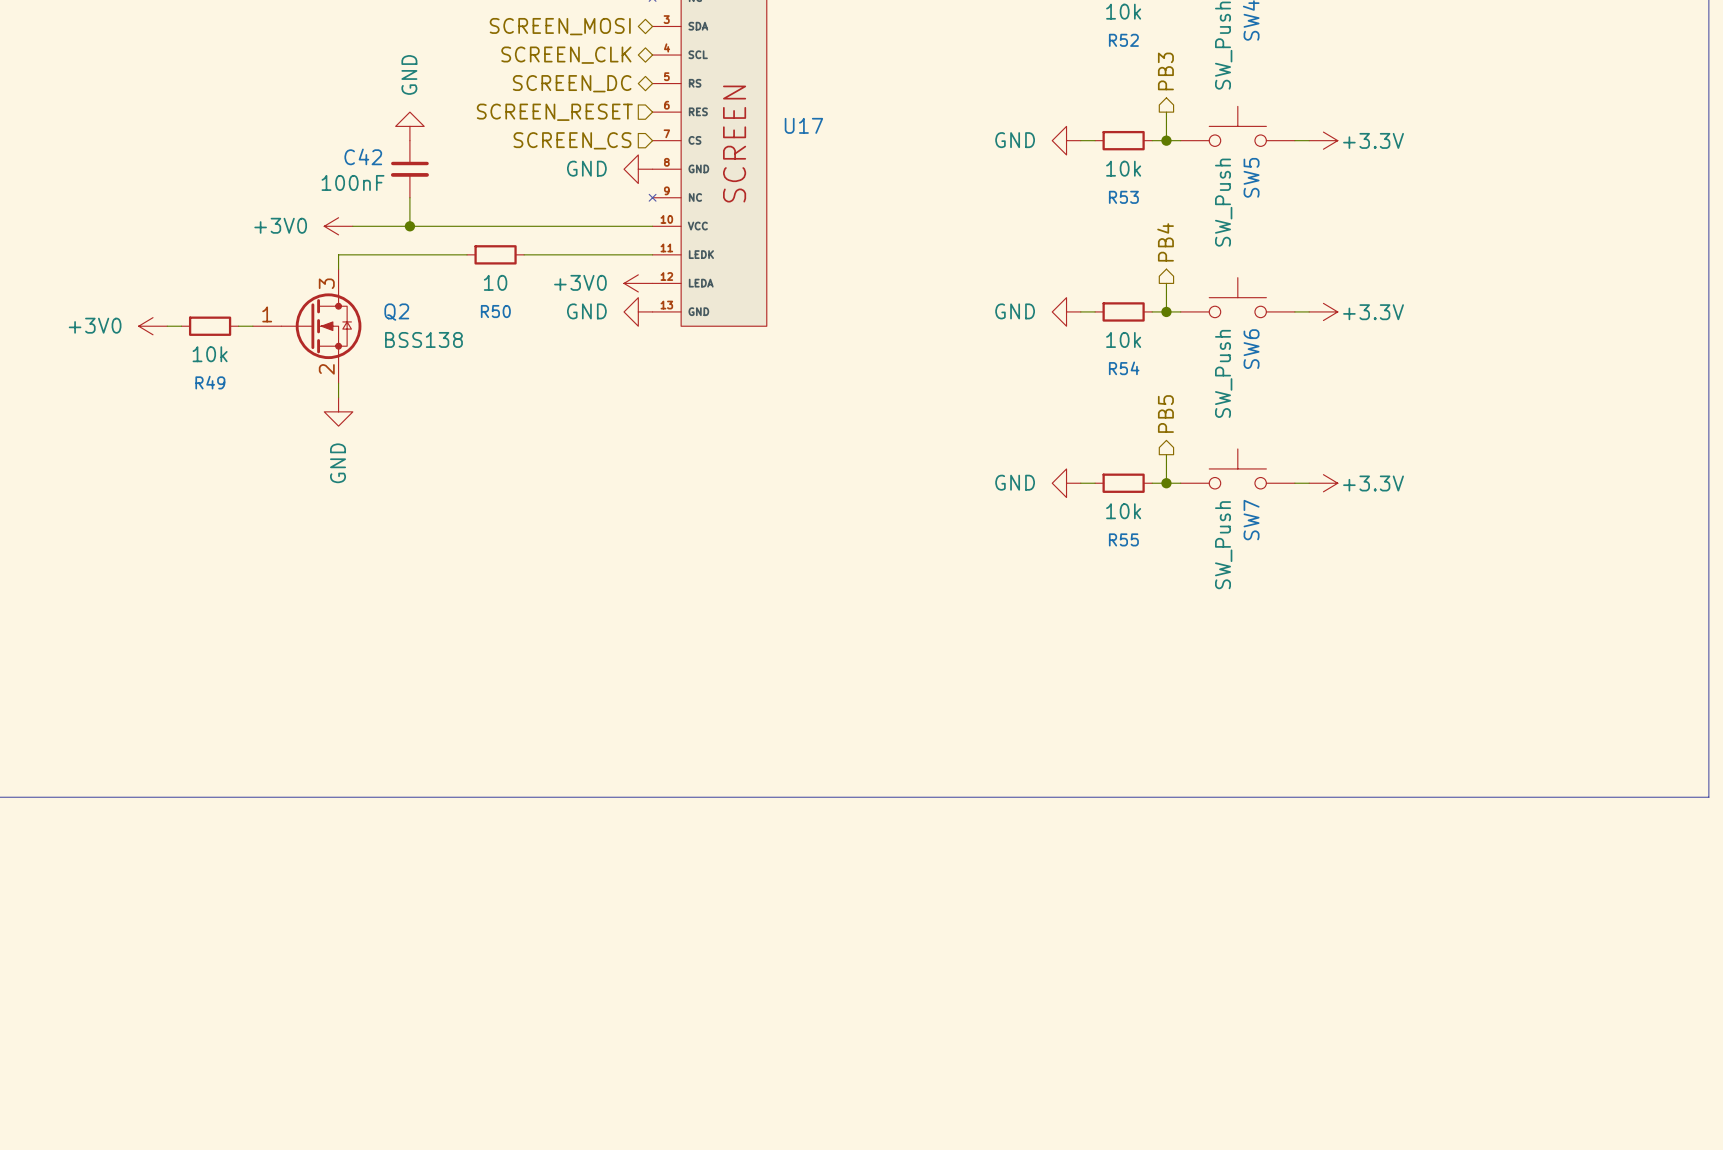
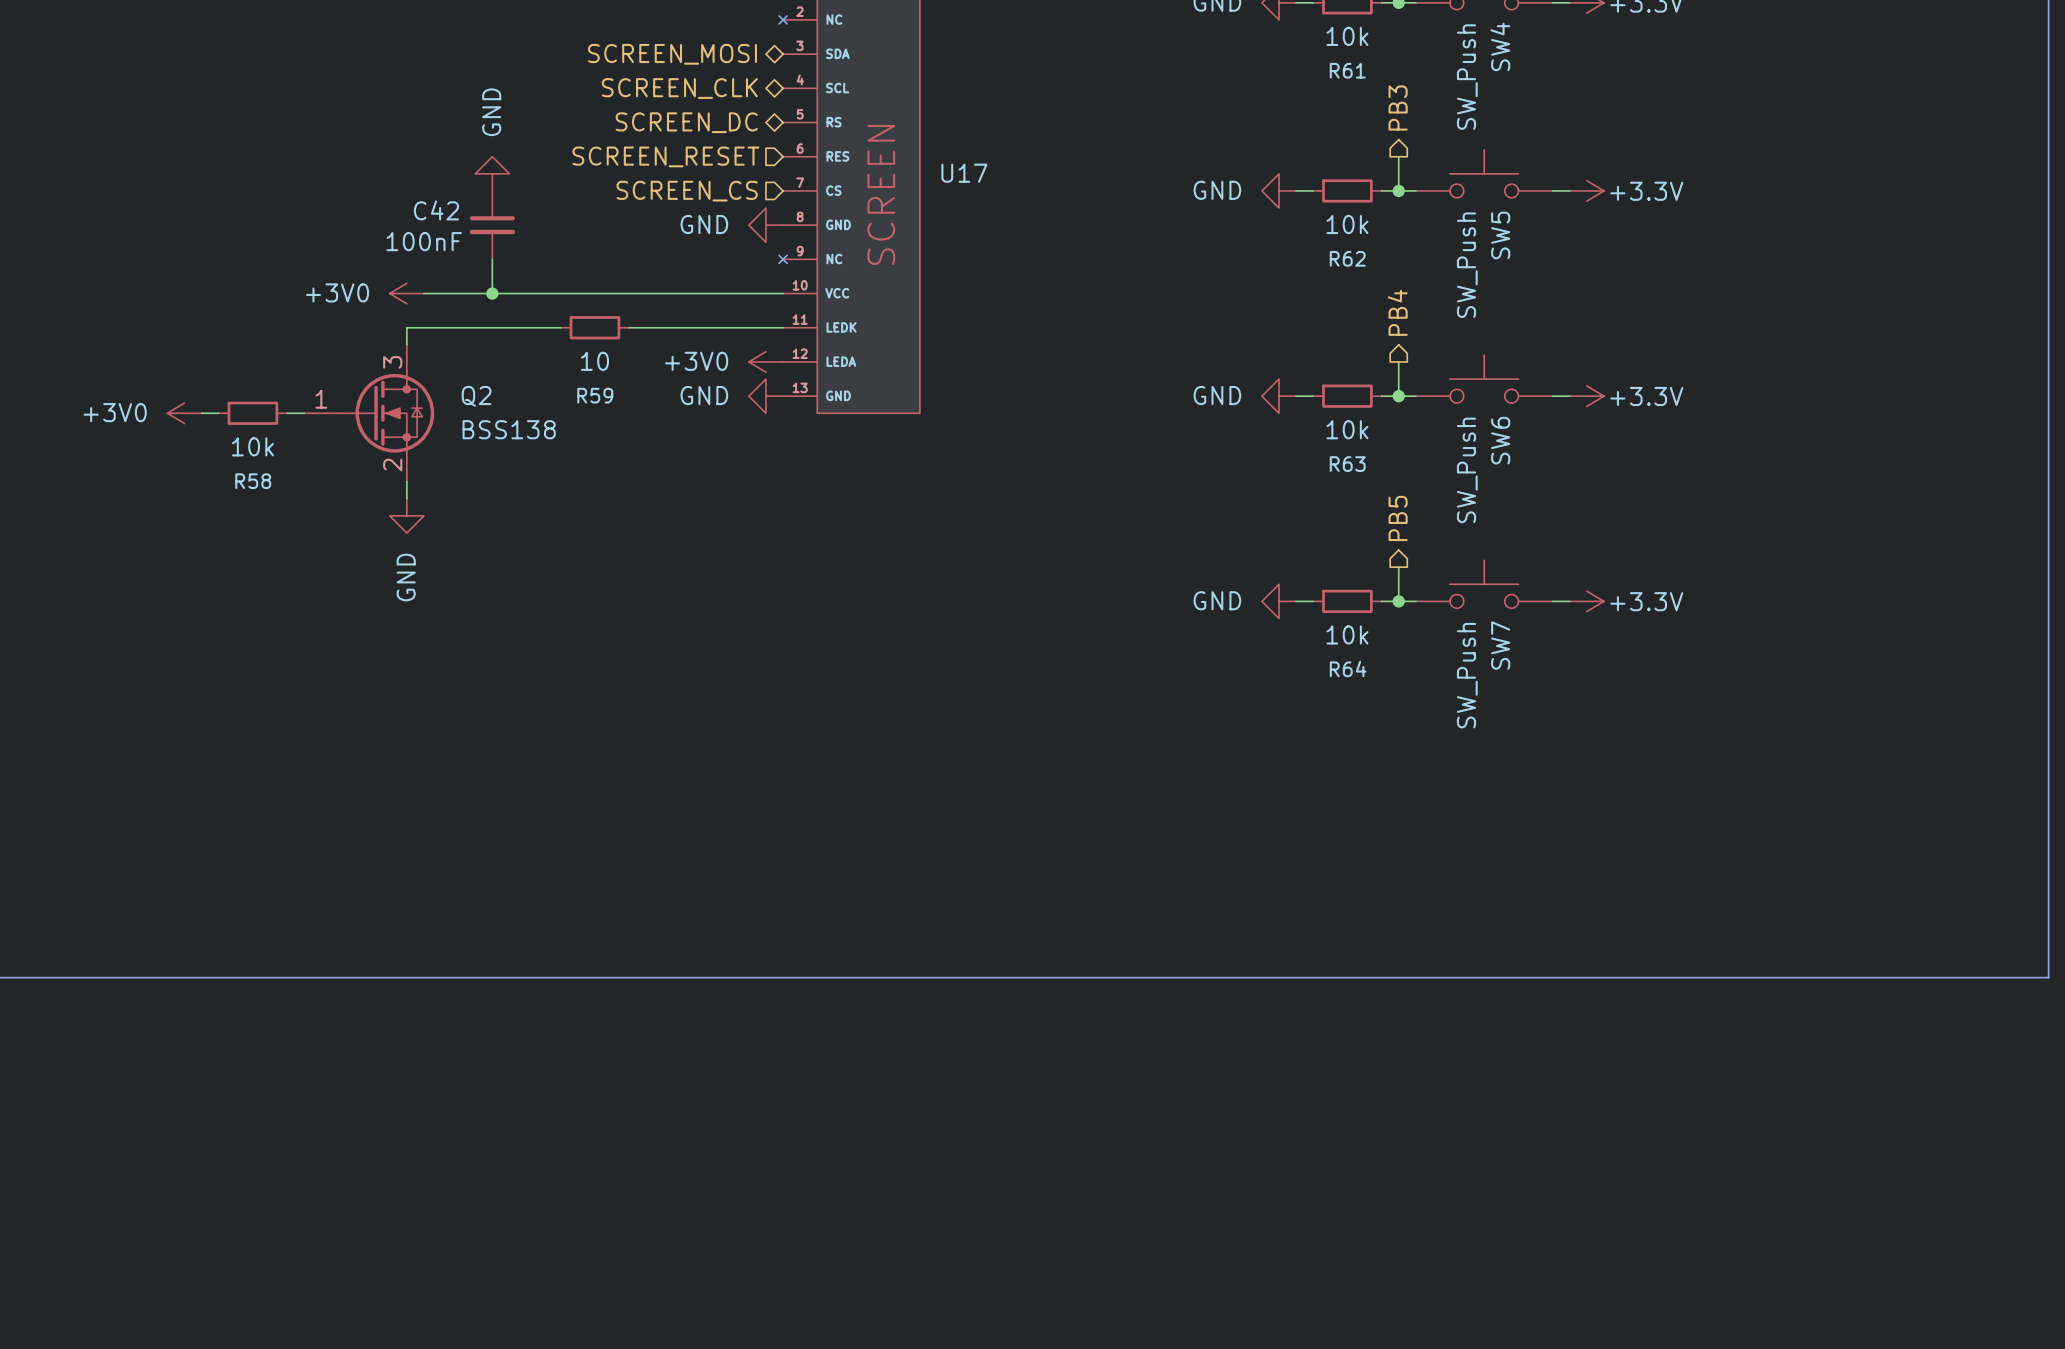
R52 name: R52 (1123, 40) -> R61 (1347, 70)
R53 name: R53 (1123, 197) -> R62 (1347, 258)
R50 name: R50 (495, 311) -> R59 (595, 395)
R54 name: R54 (1124, 368) -> R63 (1347, 464)
R49 name: R49 (210, 382) -> R58 (253, 481)
R55 name: R55 (1123, 539) -> R64 (1348, 668)

